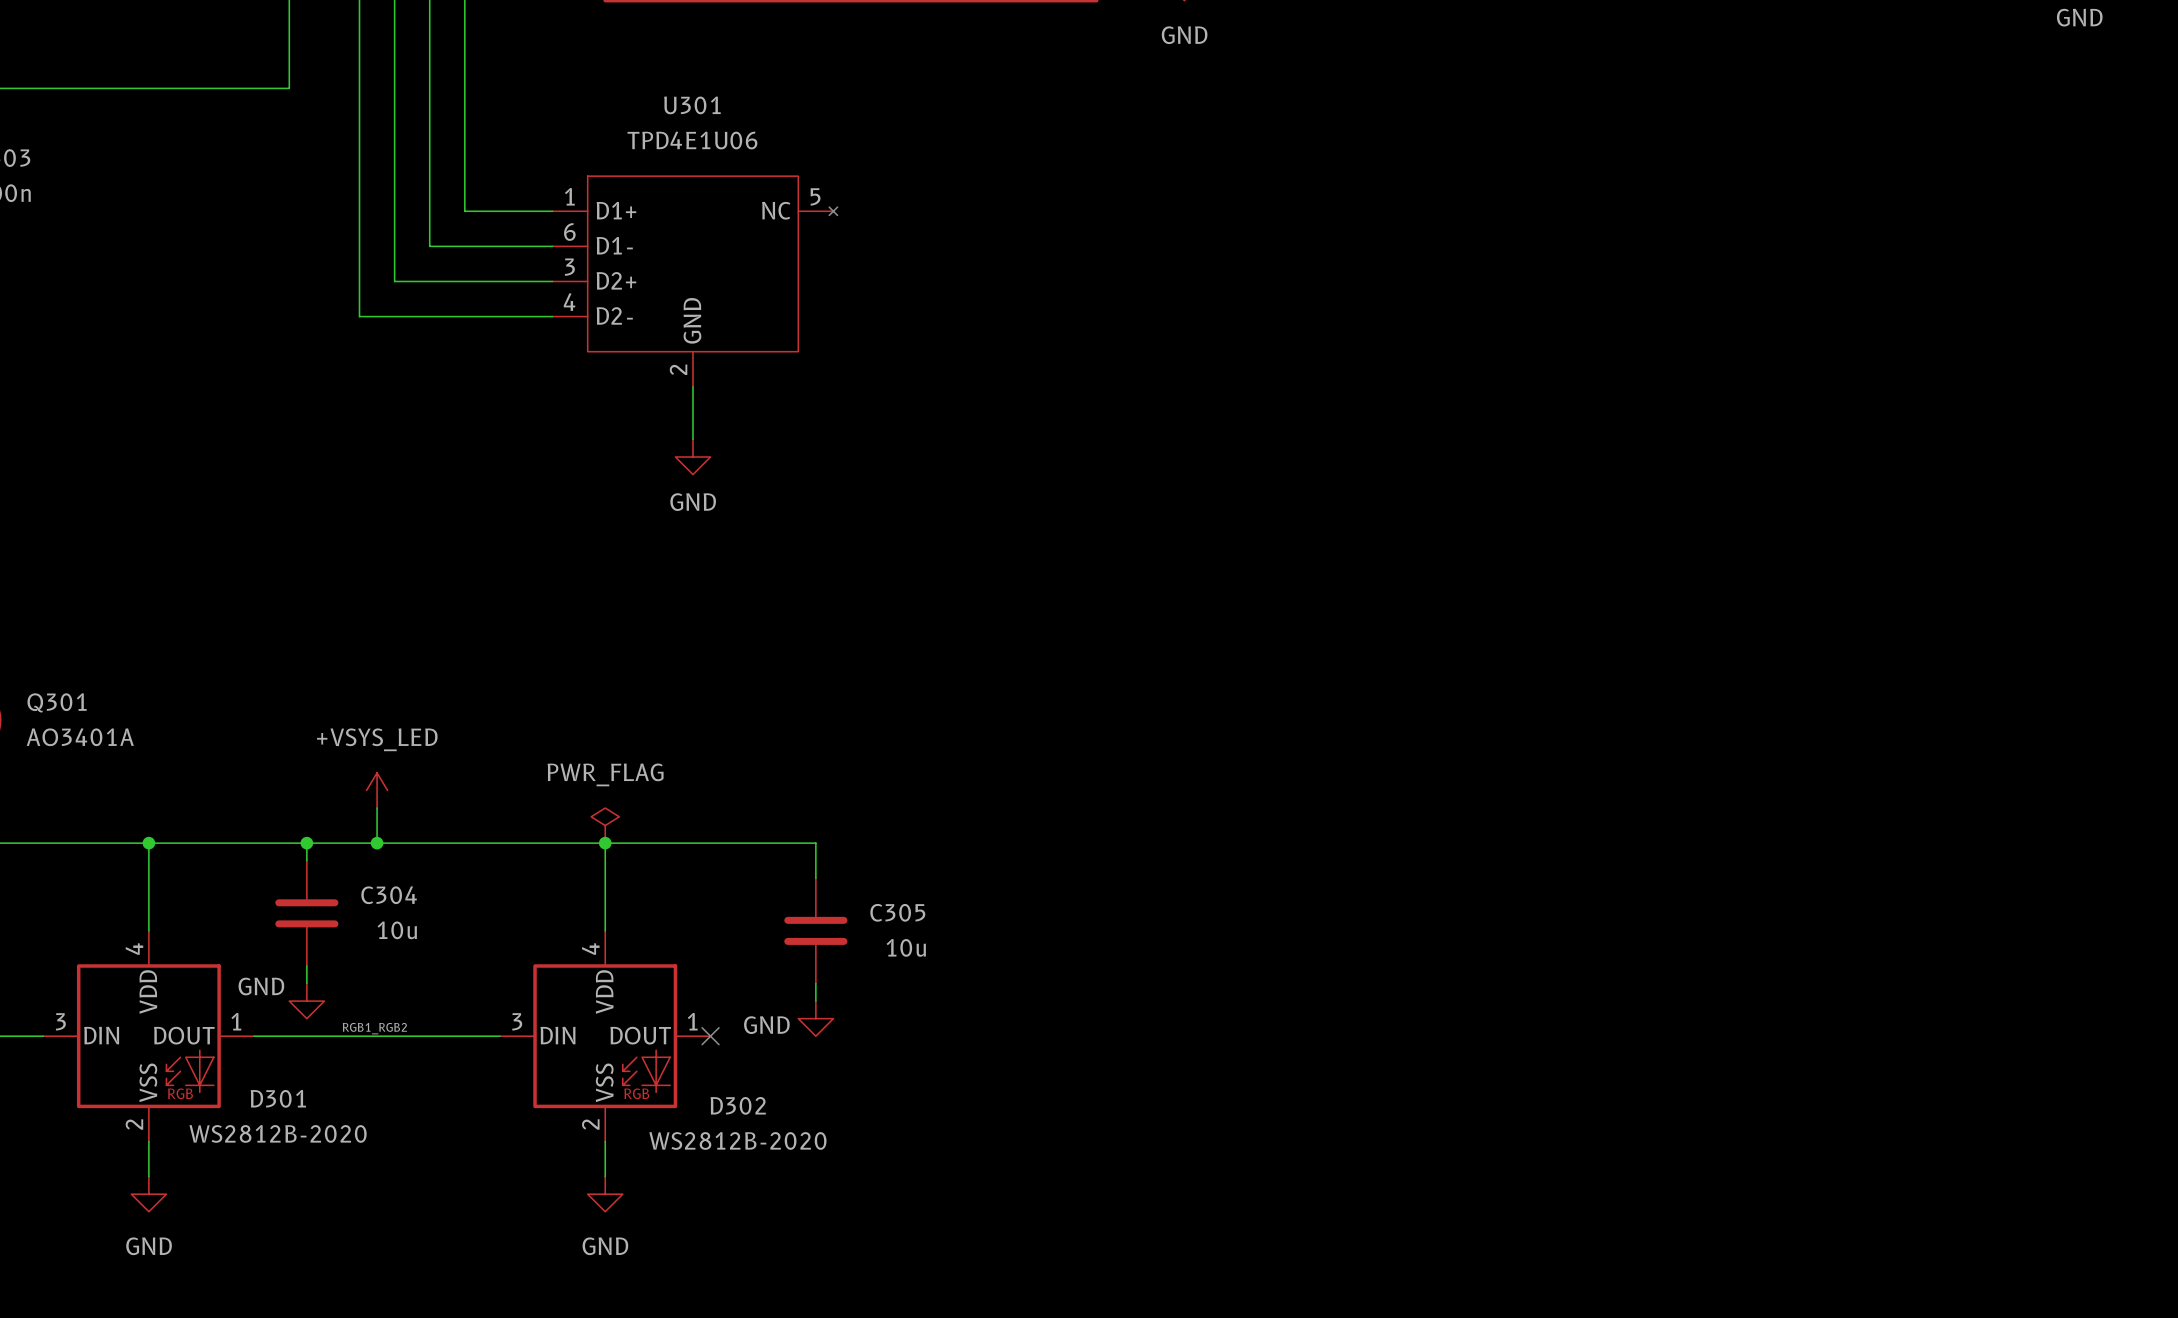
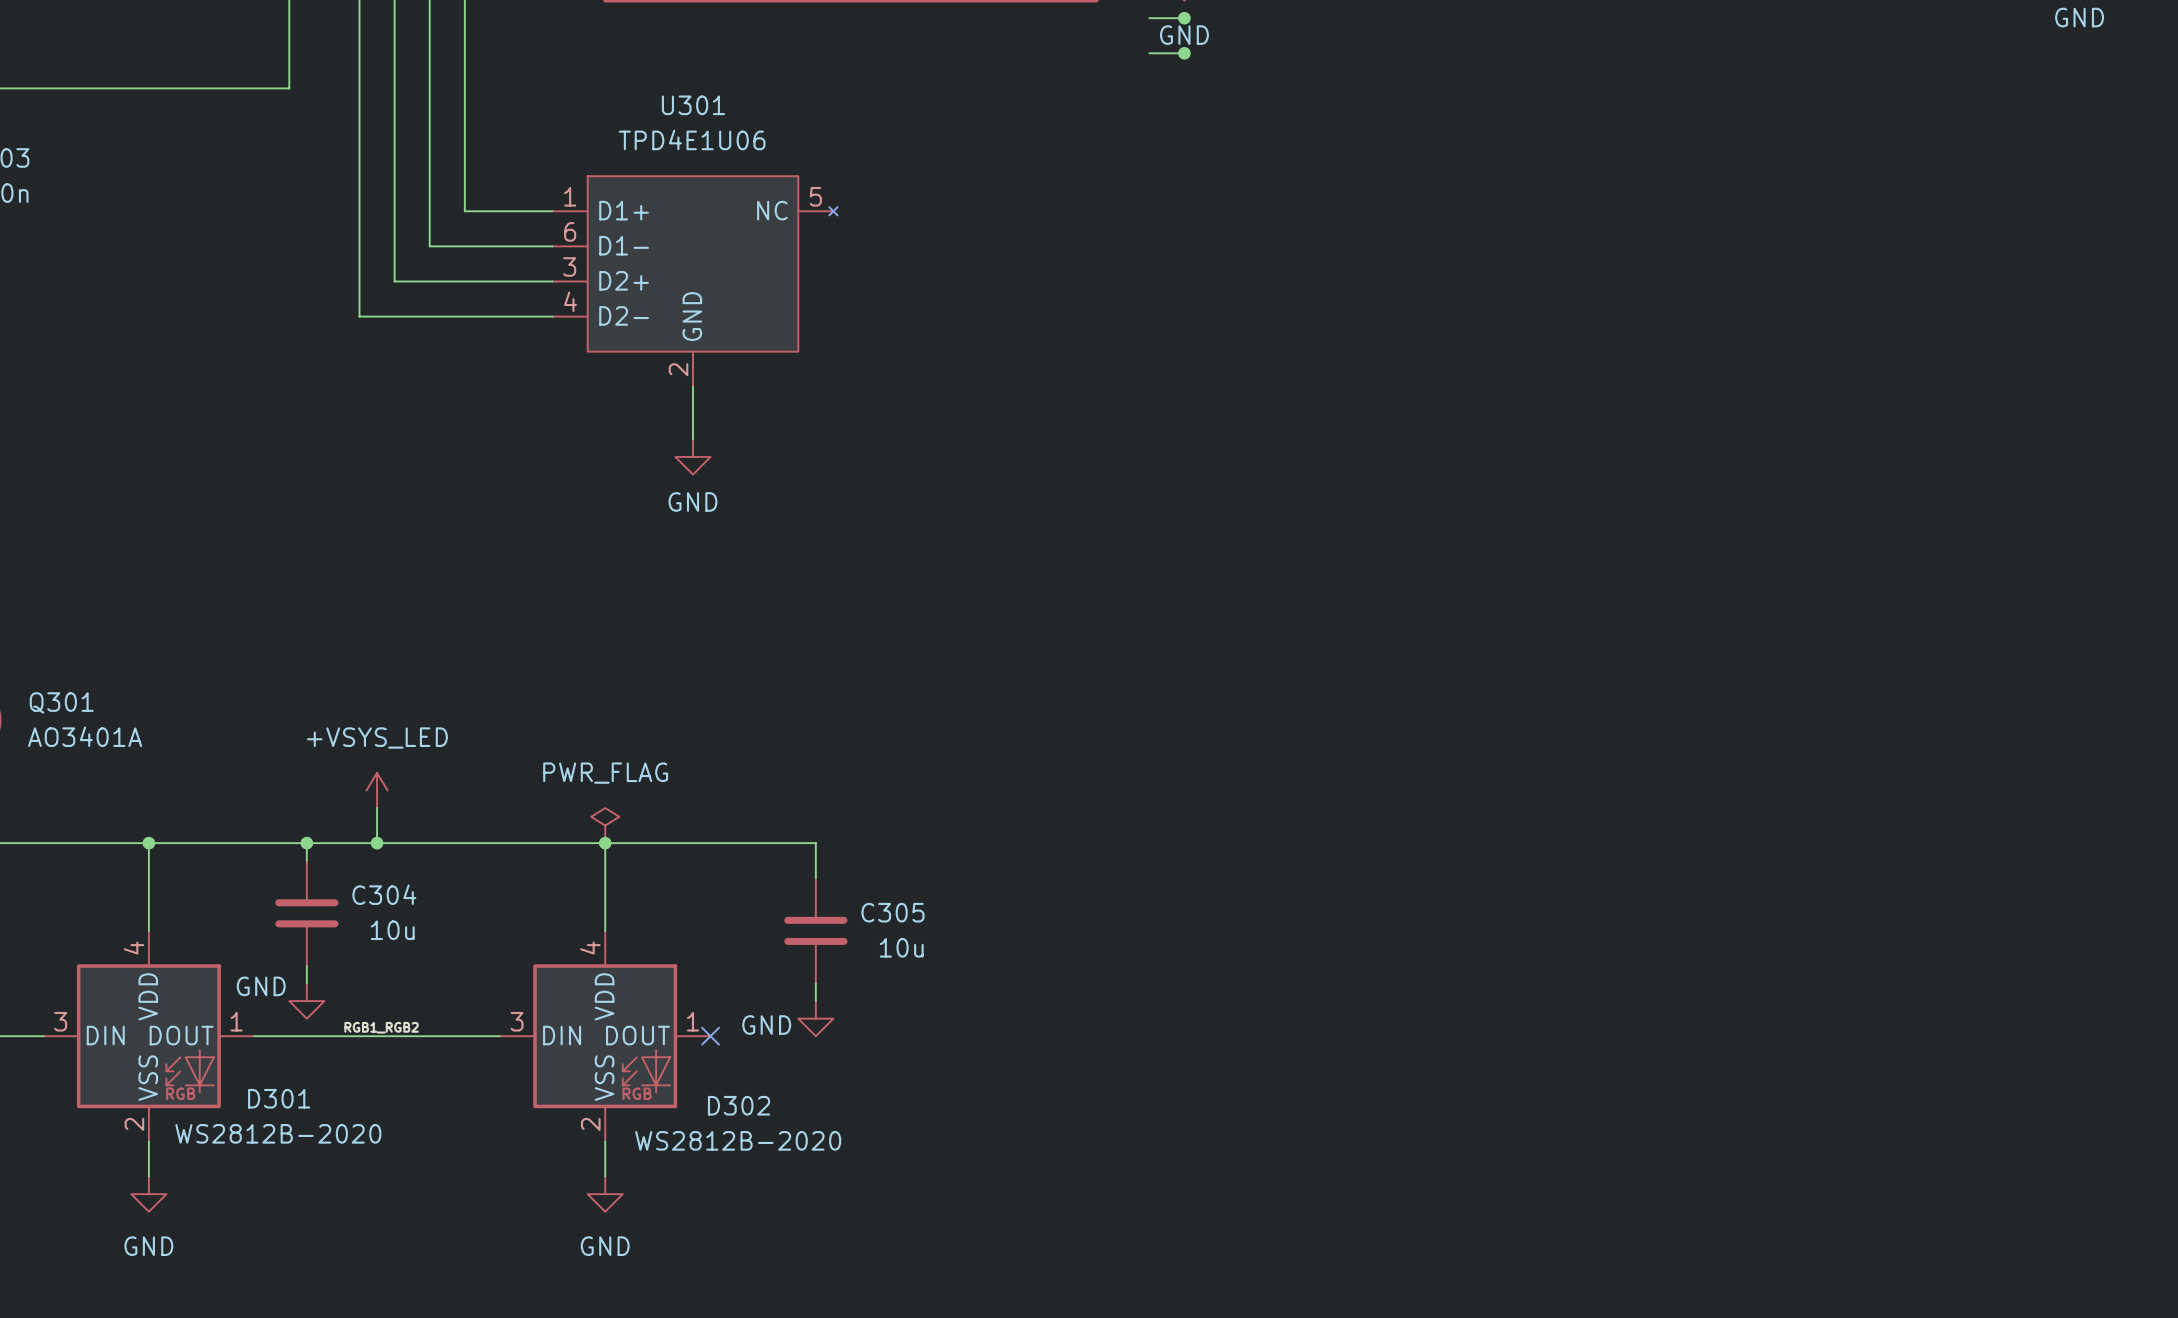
wire: none -> (1149, 18) (1184, 18)
junction: none -> (1184, 18)
wire: none -> (1149, 53) (1184, 53)
junction: none -> (1184, 53)

